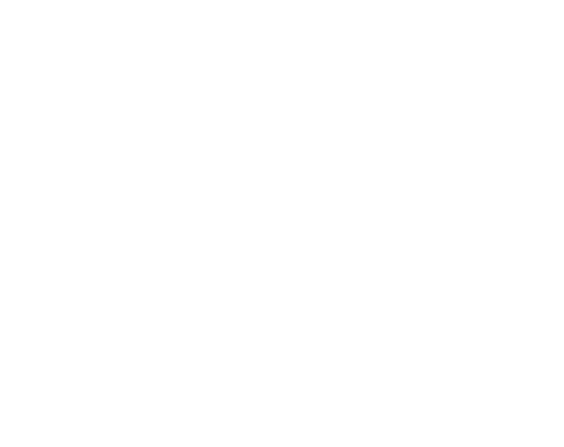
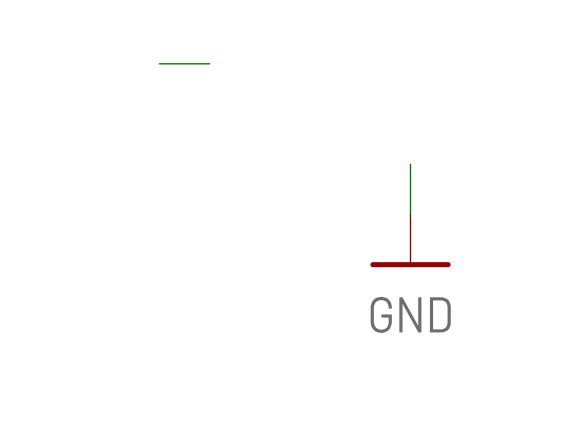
wire: none -> (159, 63) (209, 63)
wire: none -> (410, 164) (410, 214)
power symbol: none -> GND (410, 240)

